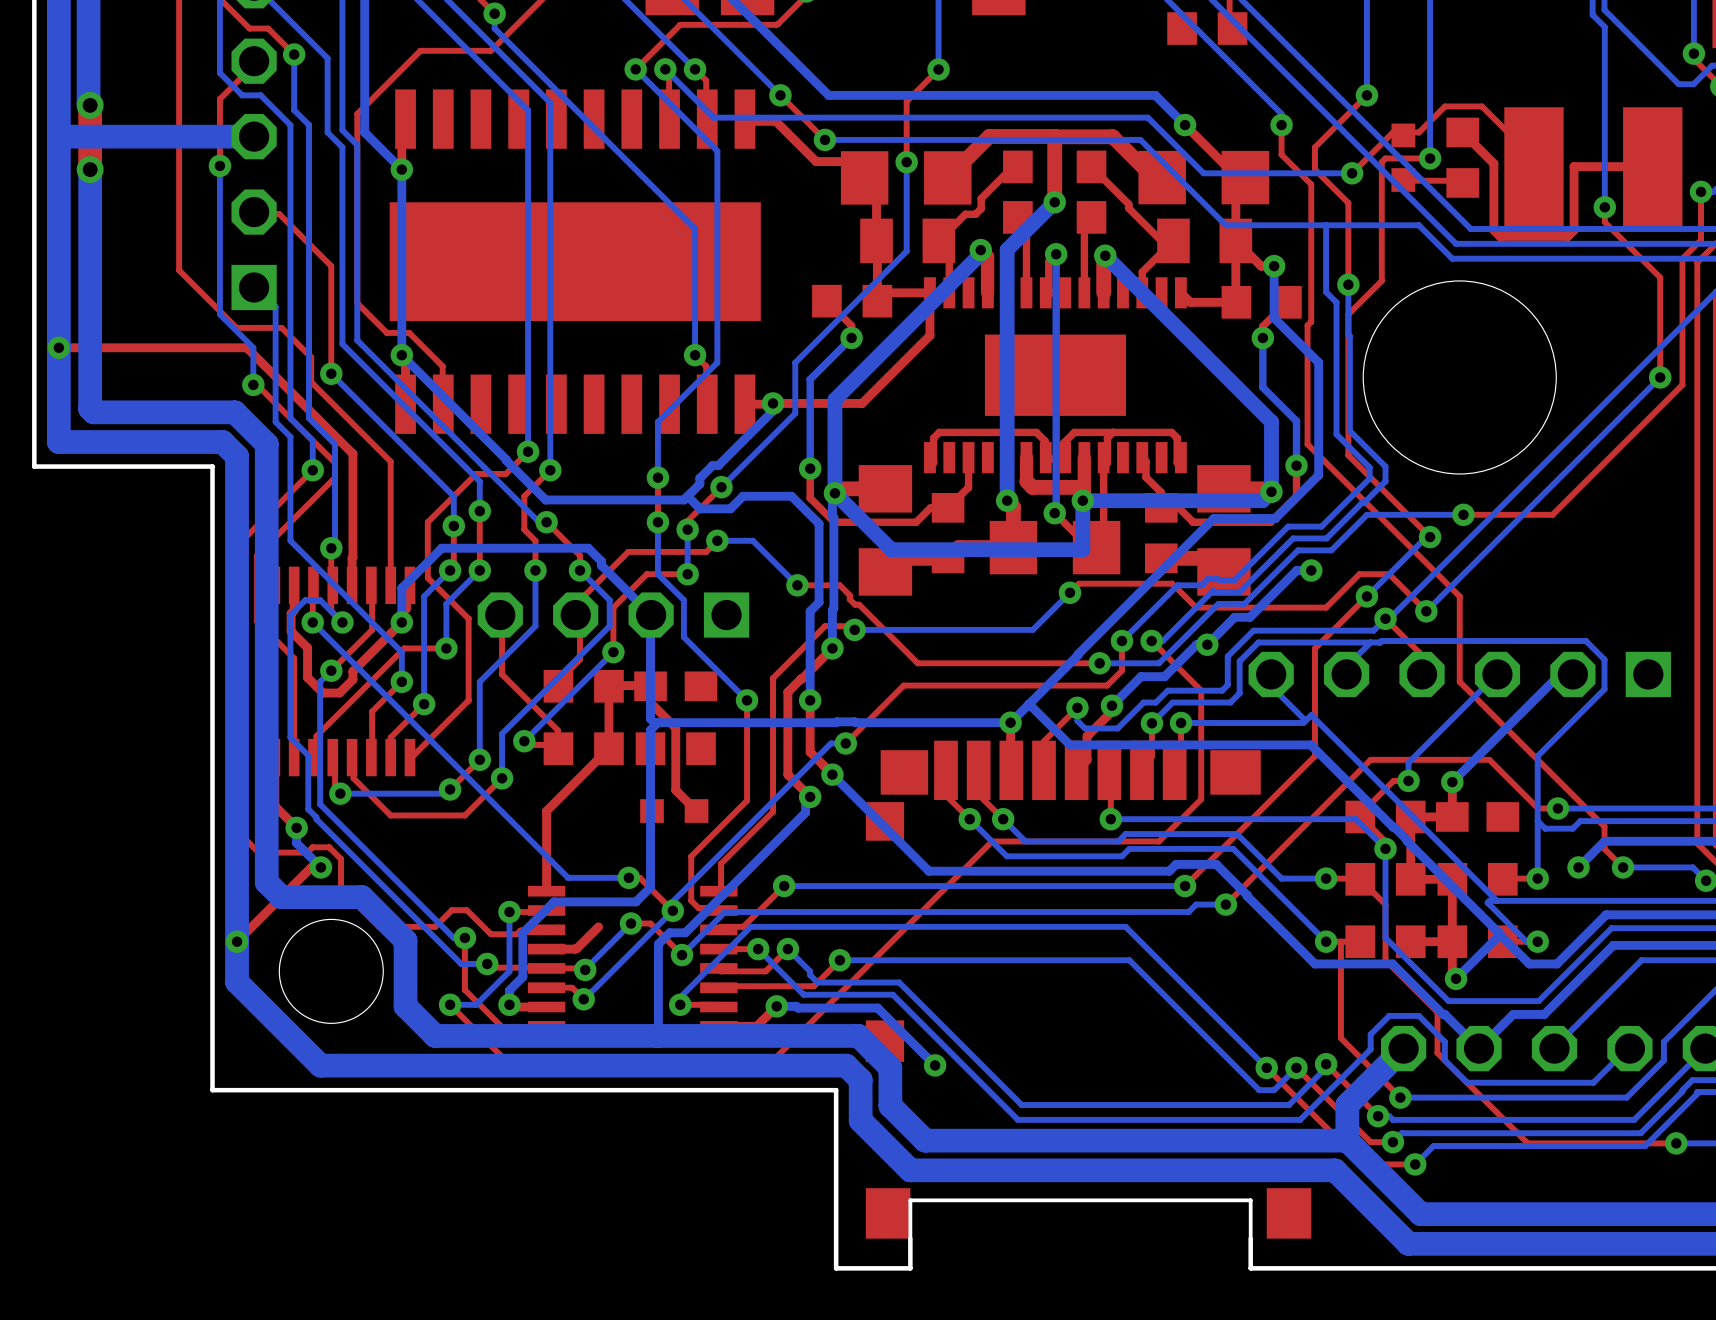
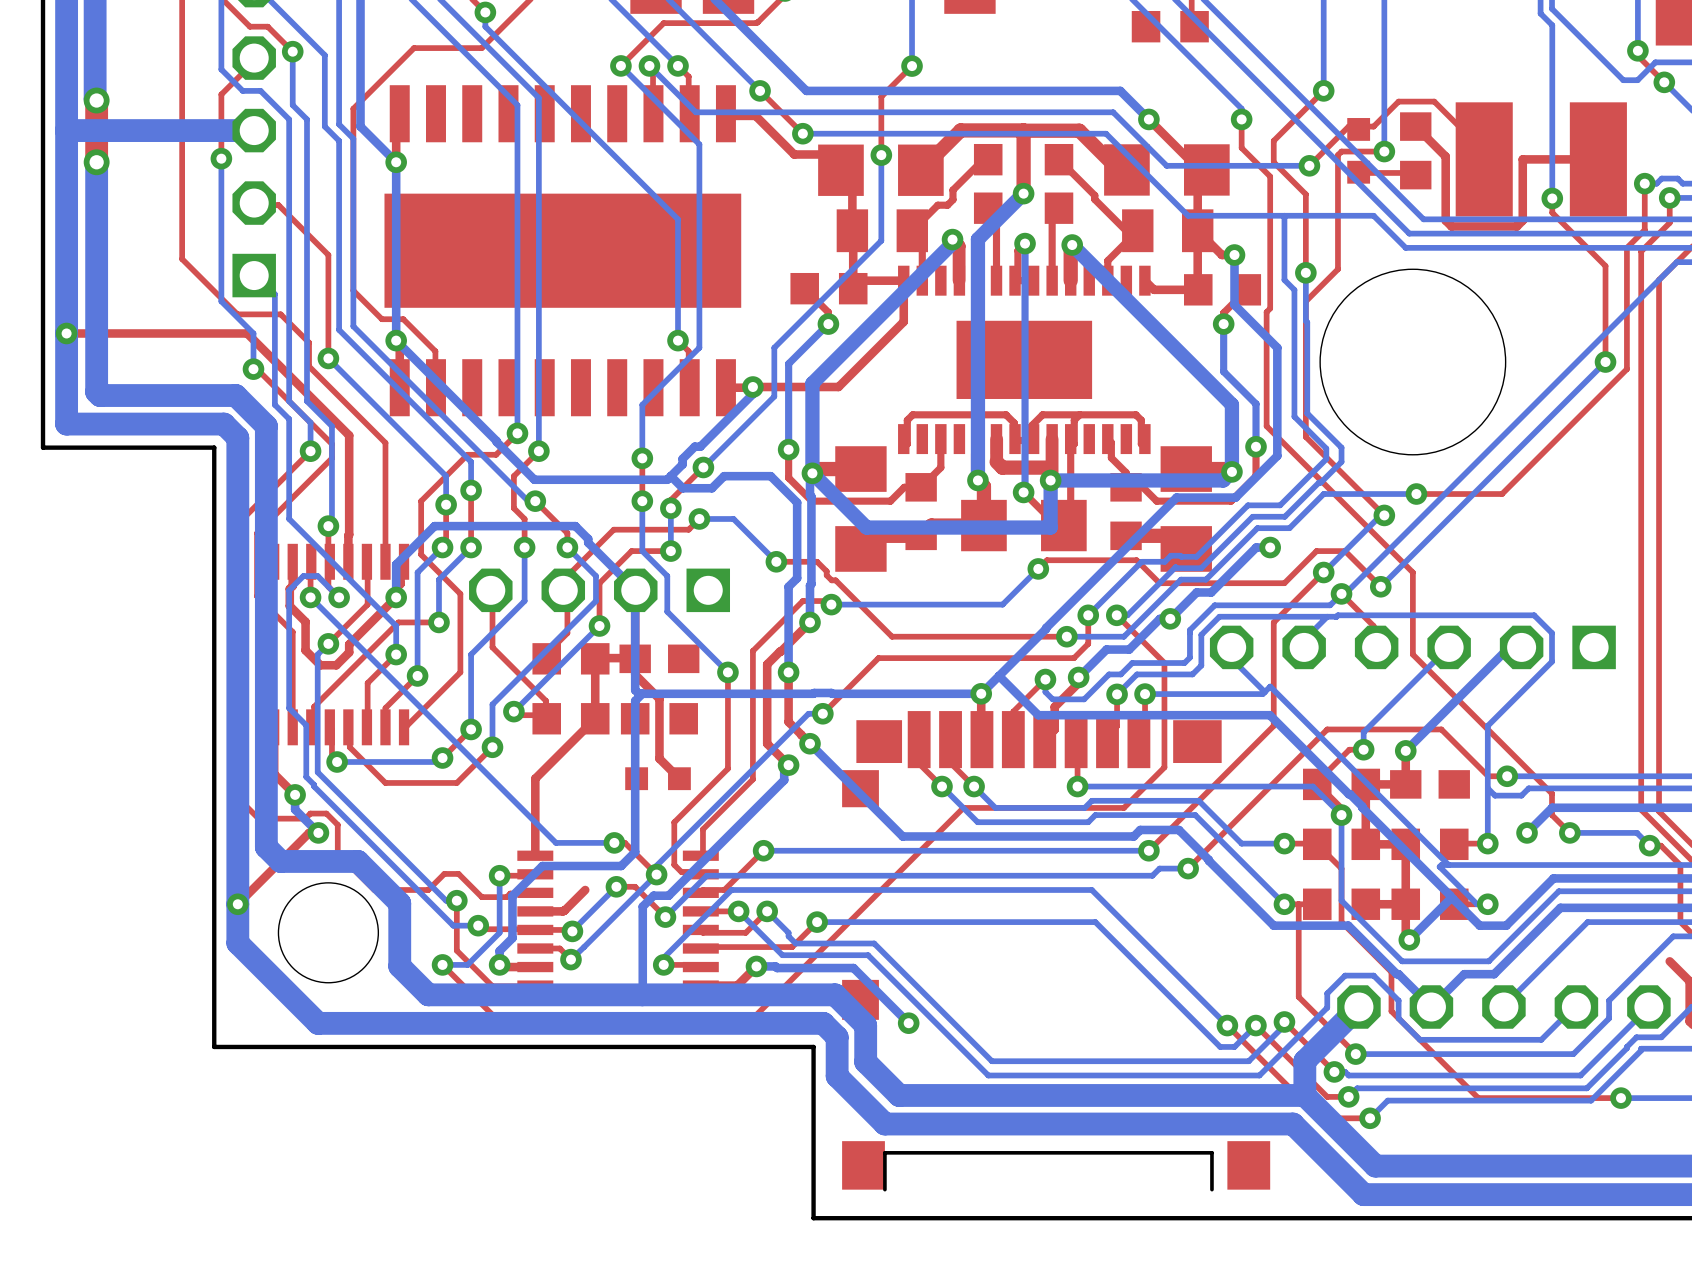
board edge: (910, 1238) (910, 1268) -> none
board edge: (1250, 1238) (1250, 1268) -> (884, 1218) (1211, 1218)

